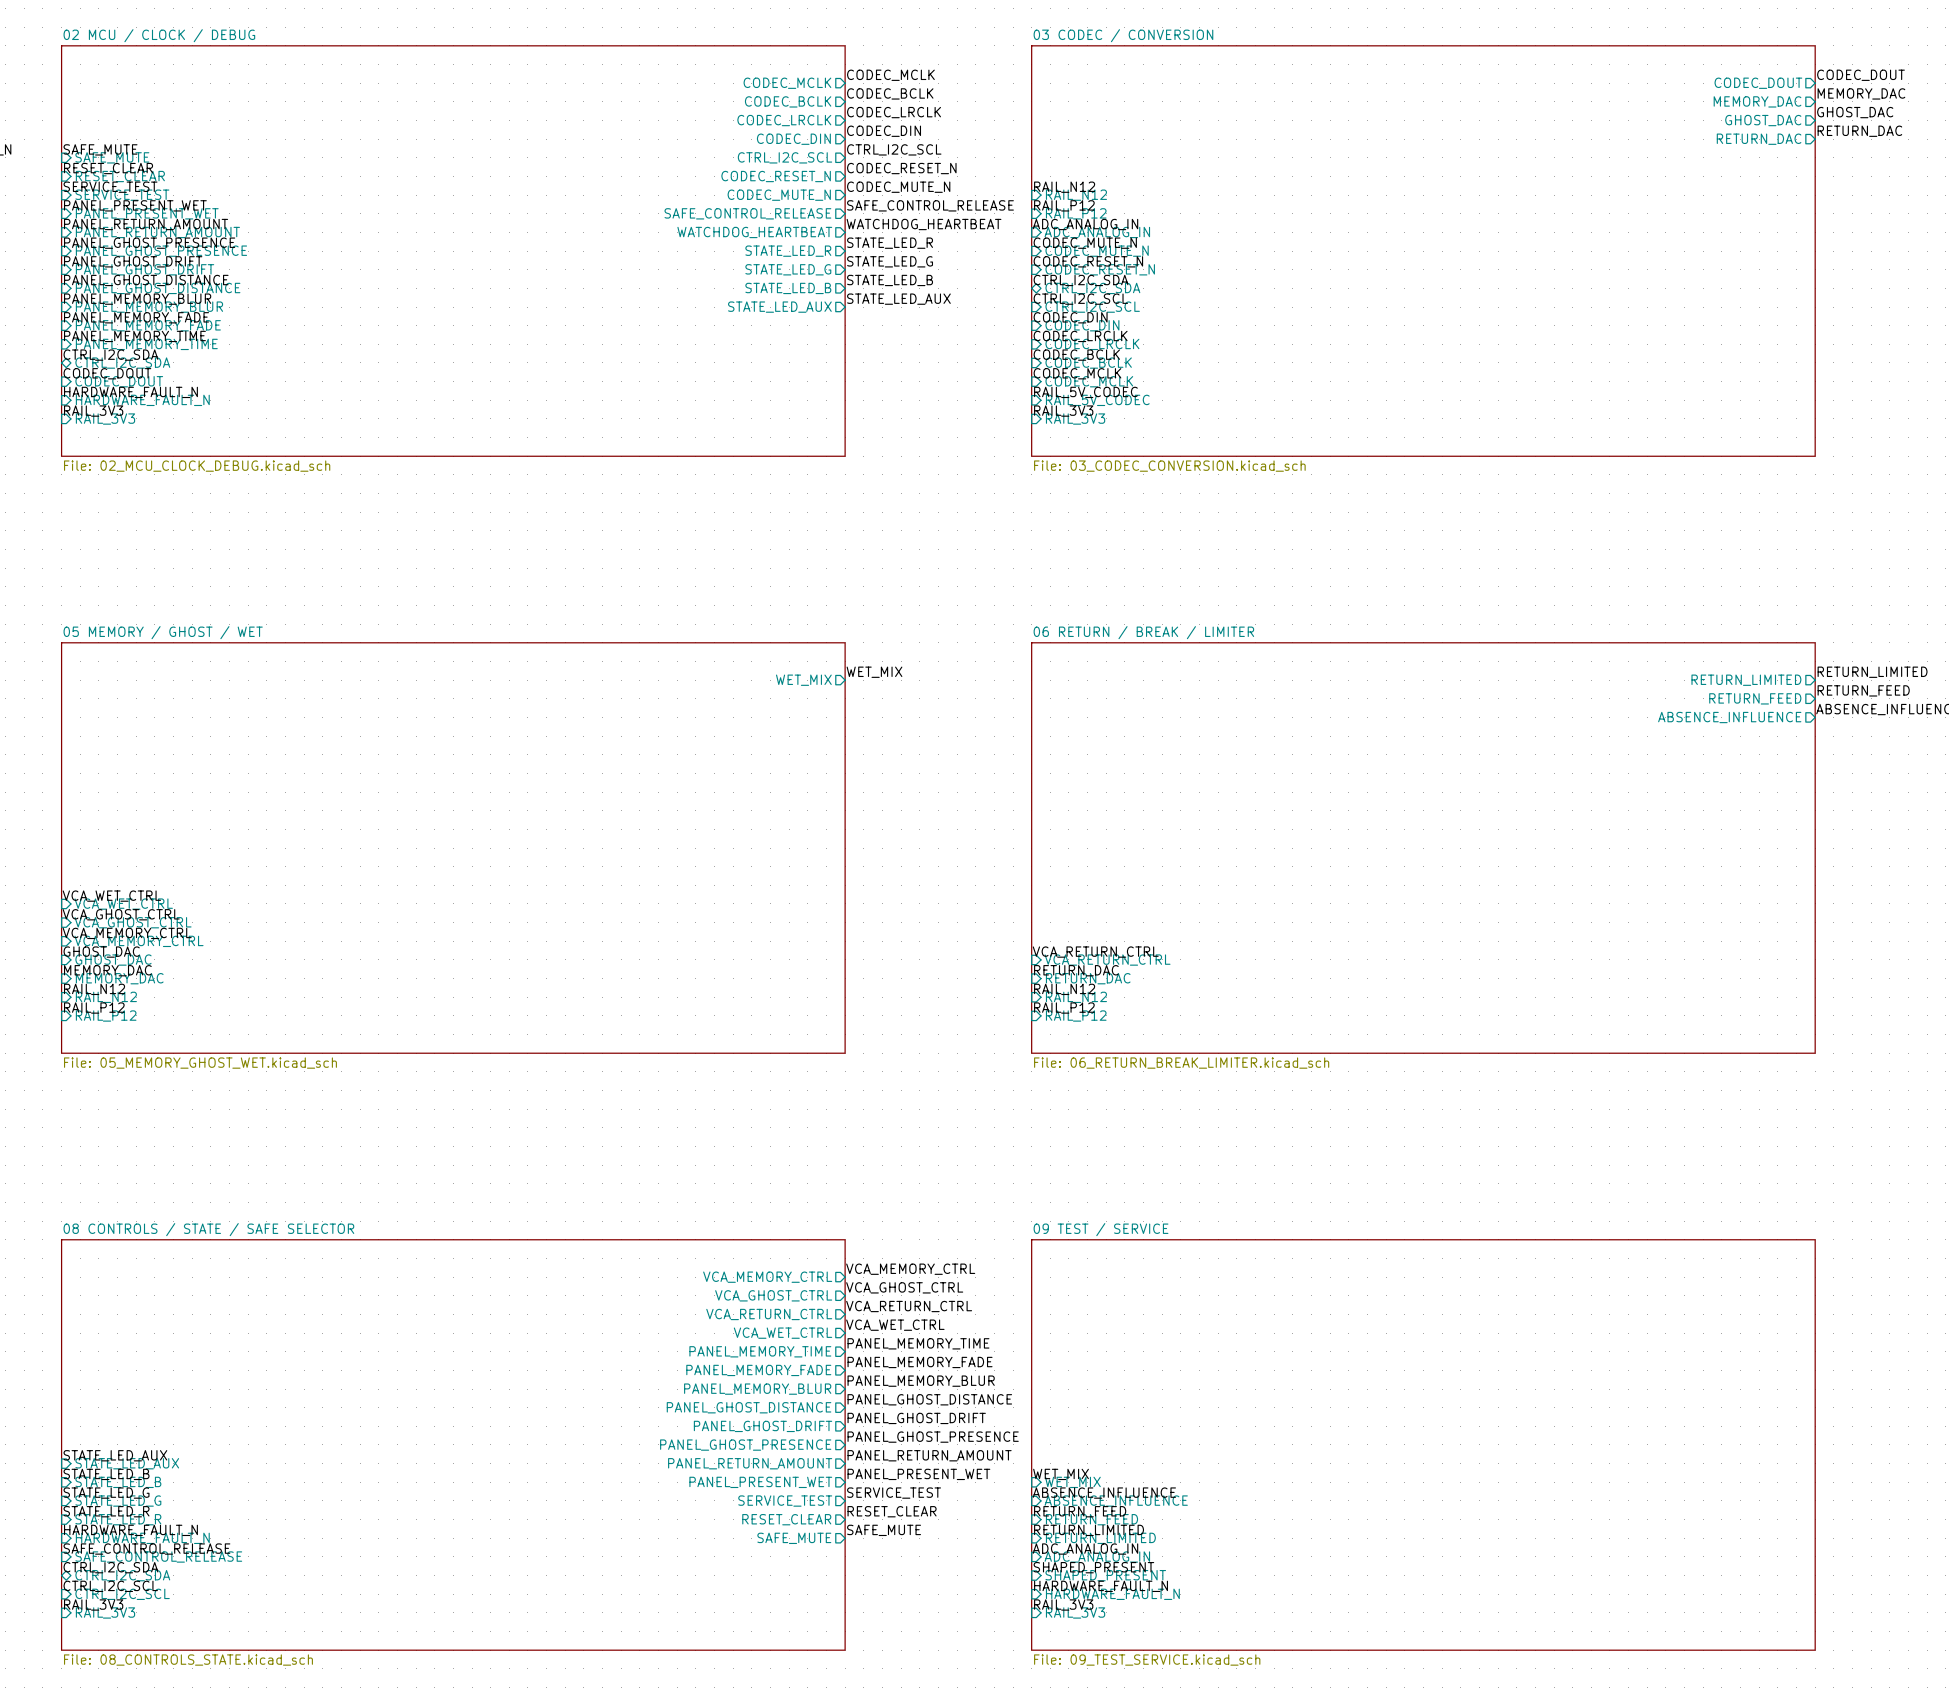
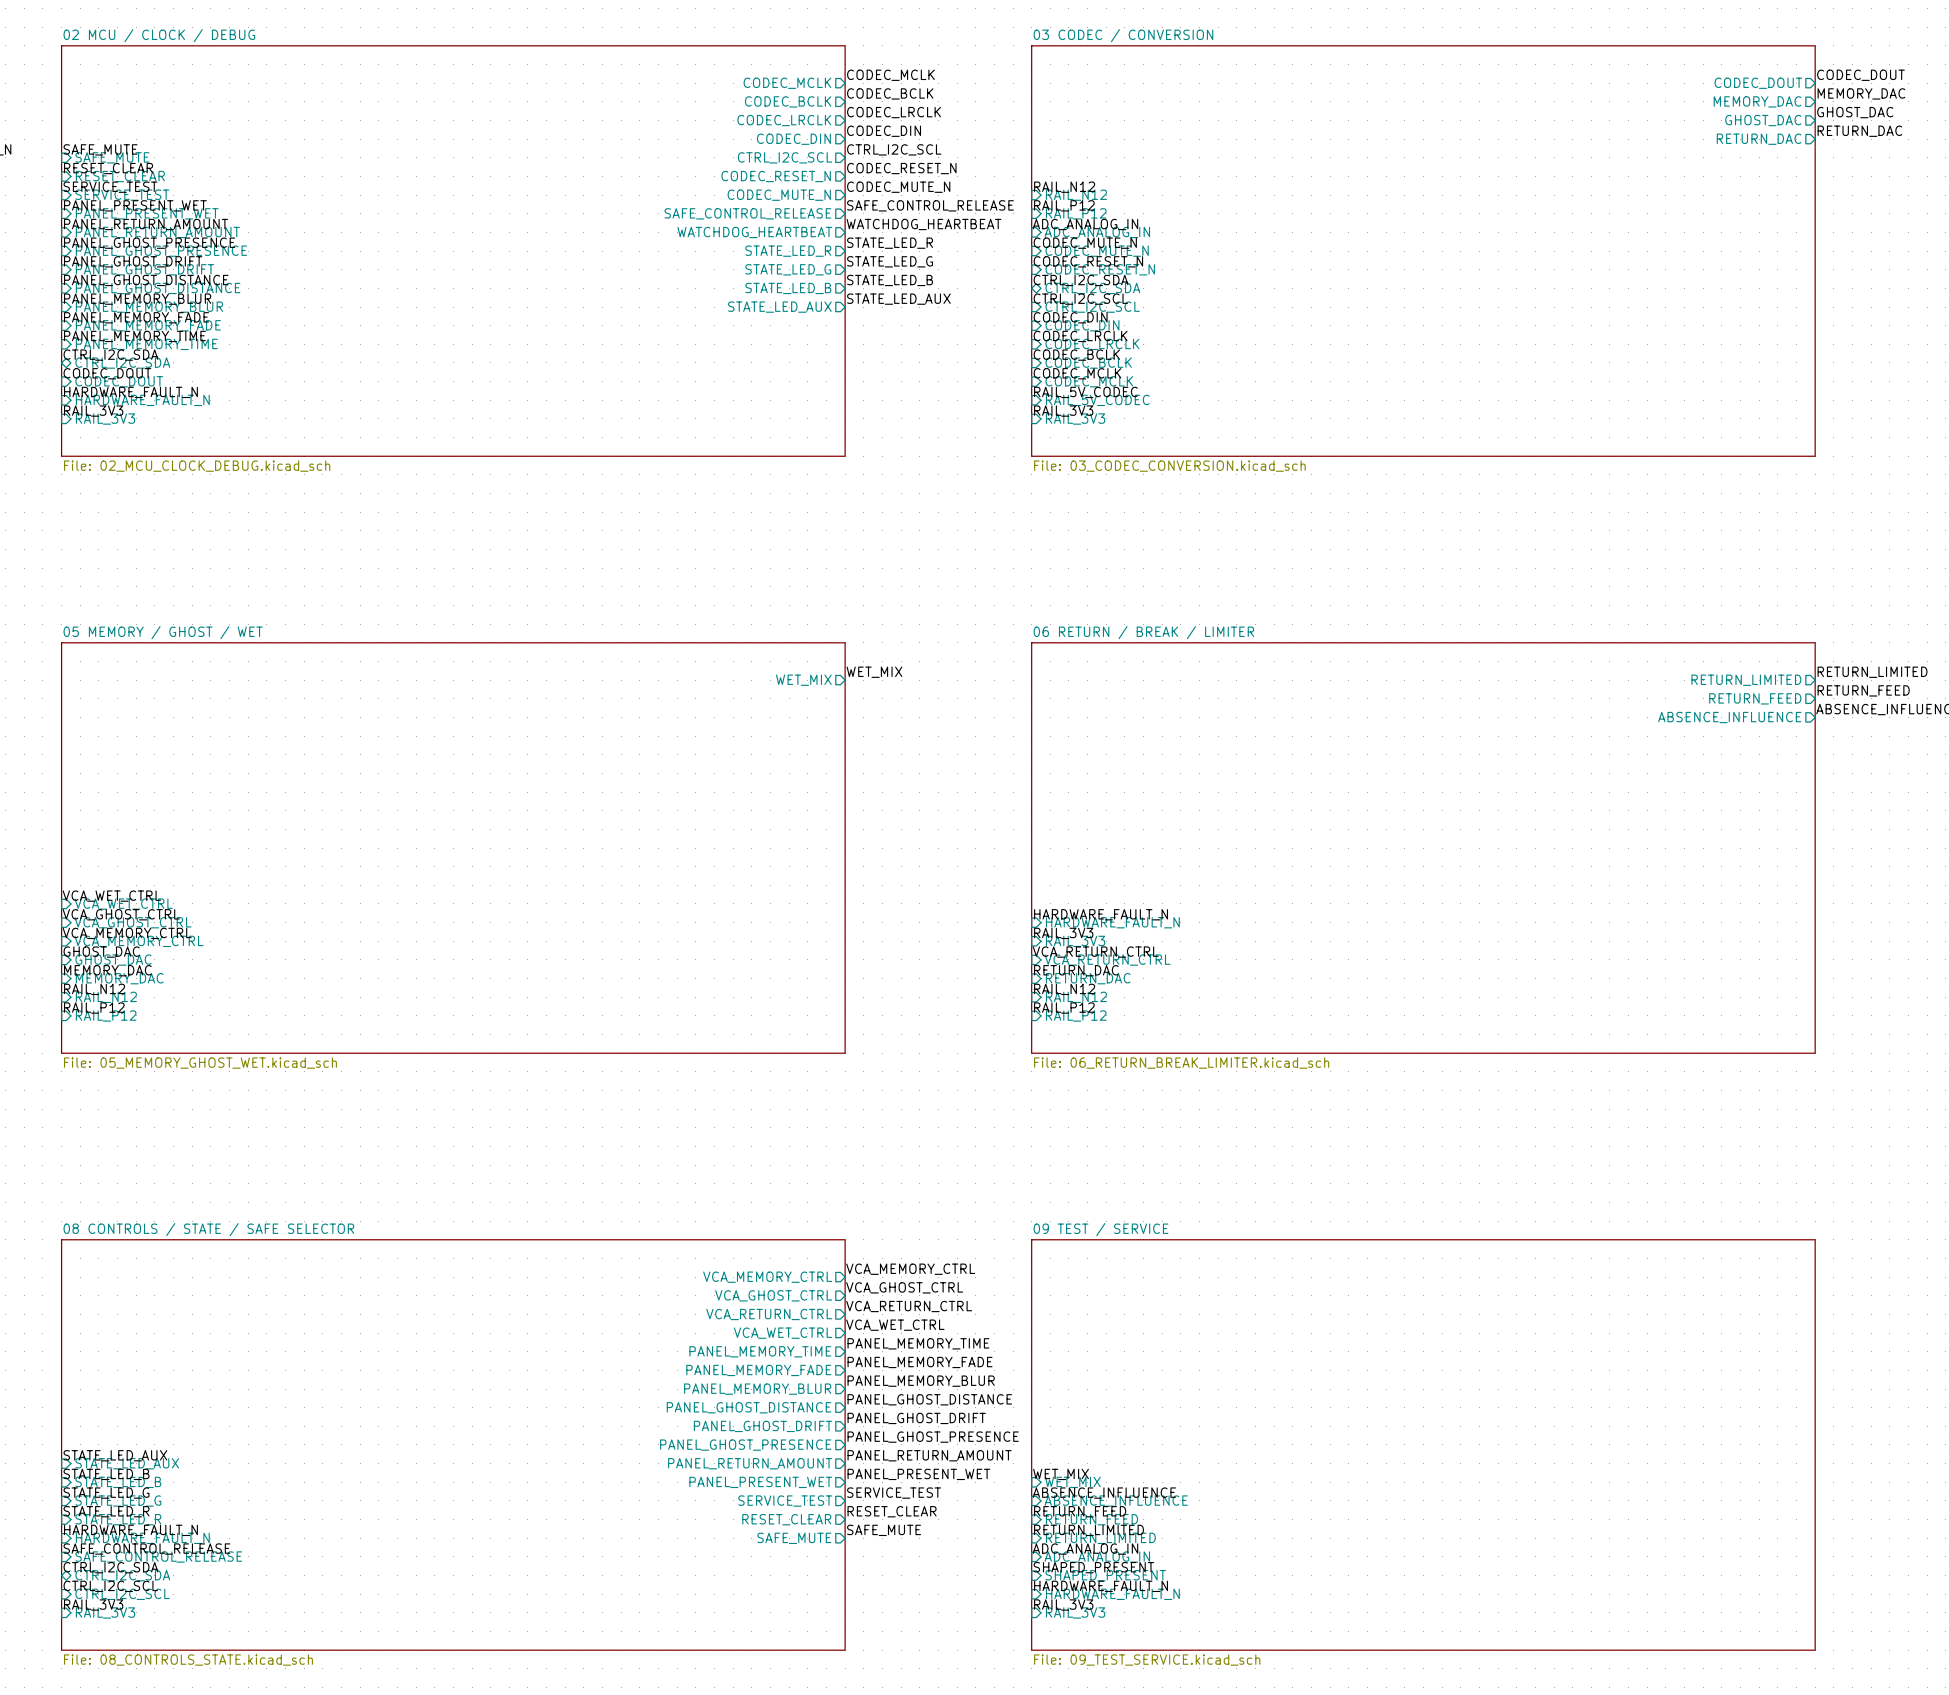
label: none -> HARDWARE_FAULT_N (1101, 914)
sheet pin: none -> HARDWARE_FAULT_N (1112, 922)
label: none -> RAIL_3V3 (1063, 933)
sheet pin: none -> RAIL_3V3 (1075, 941)

